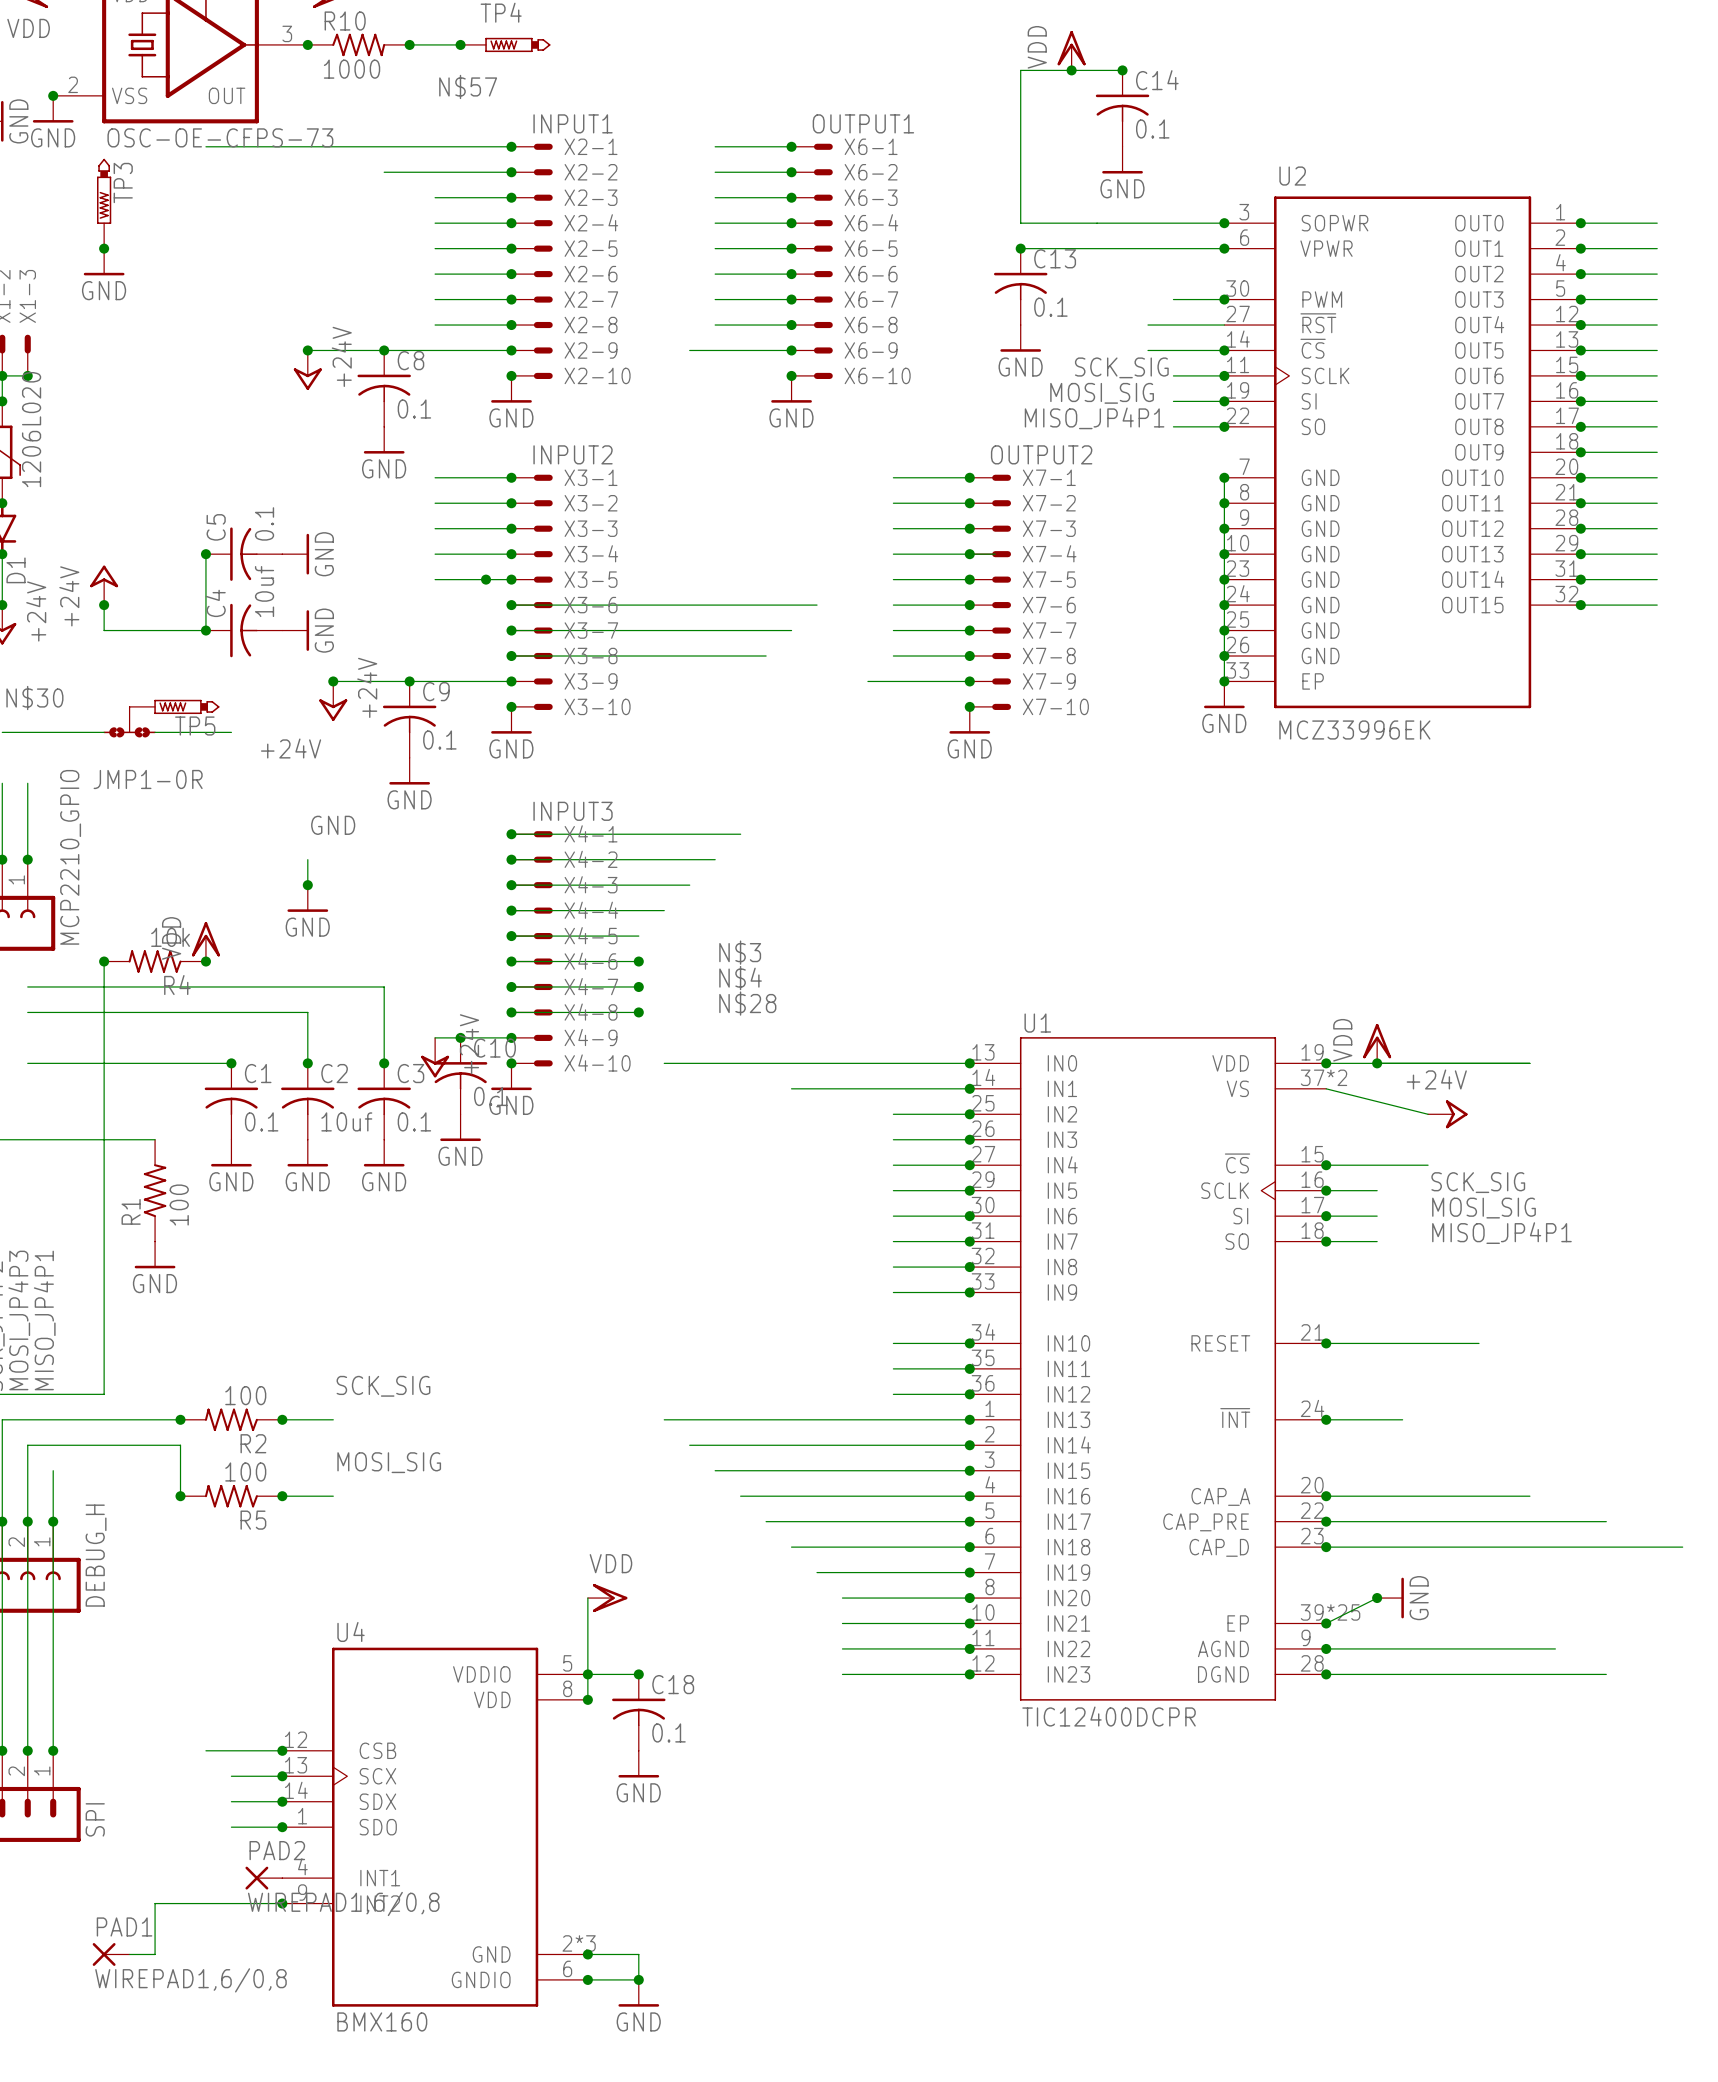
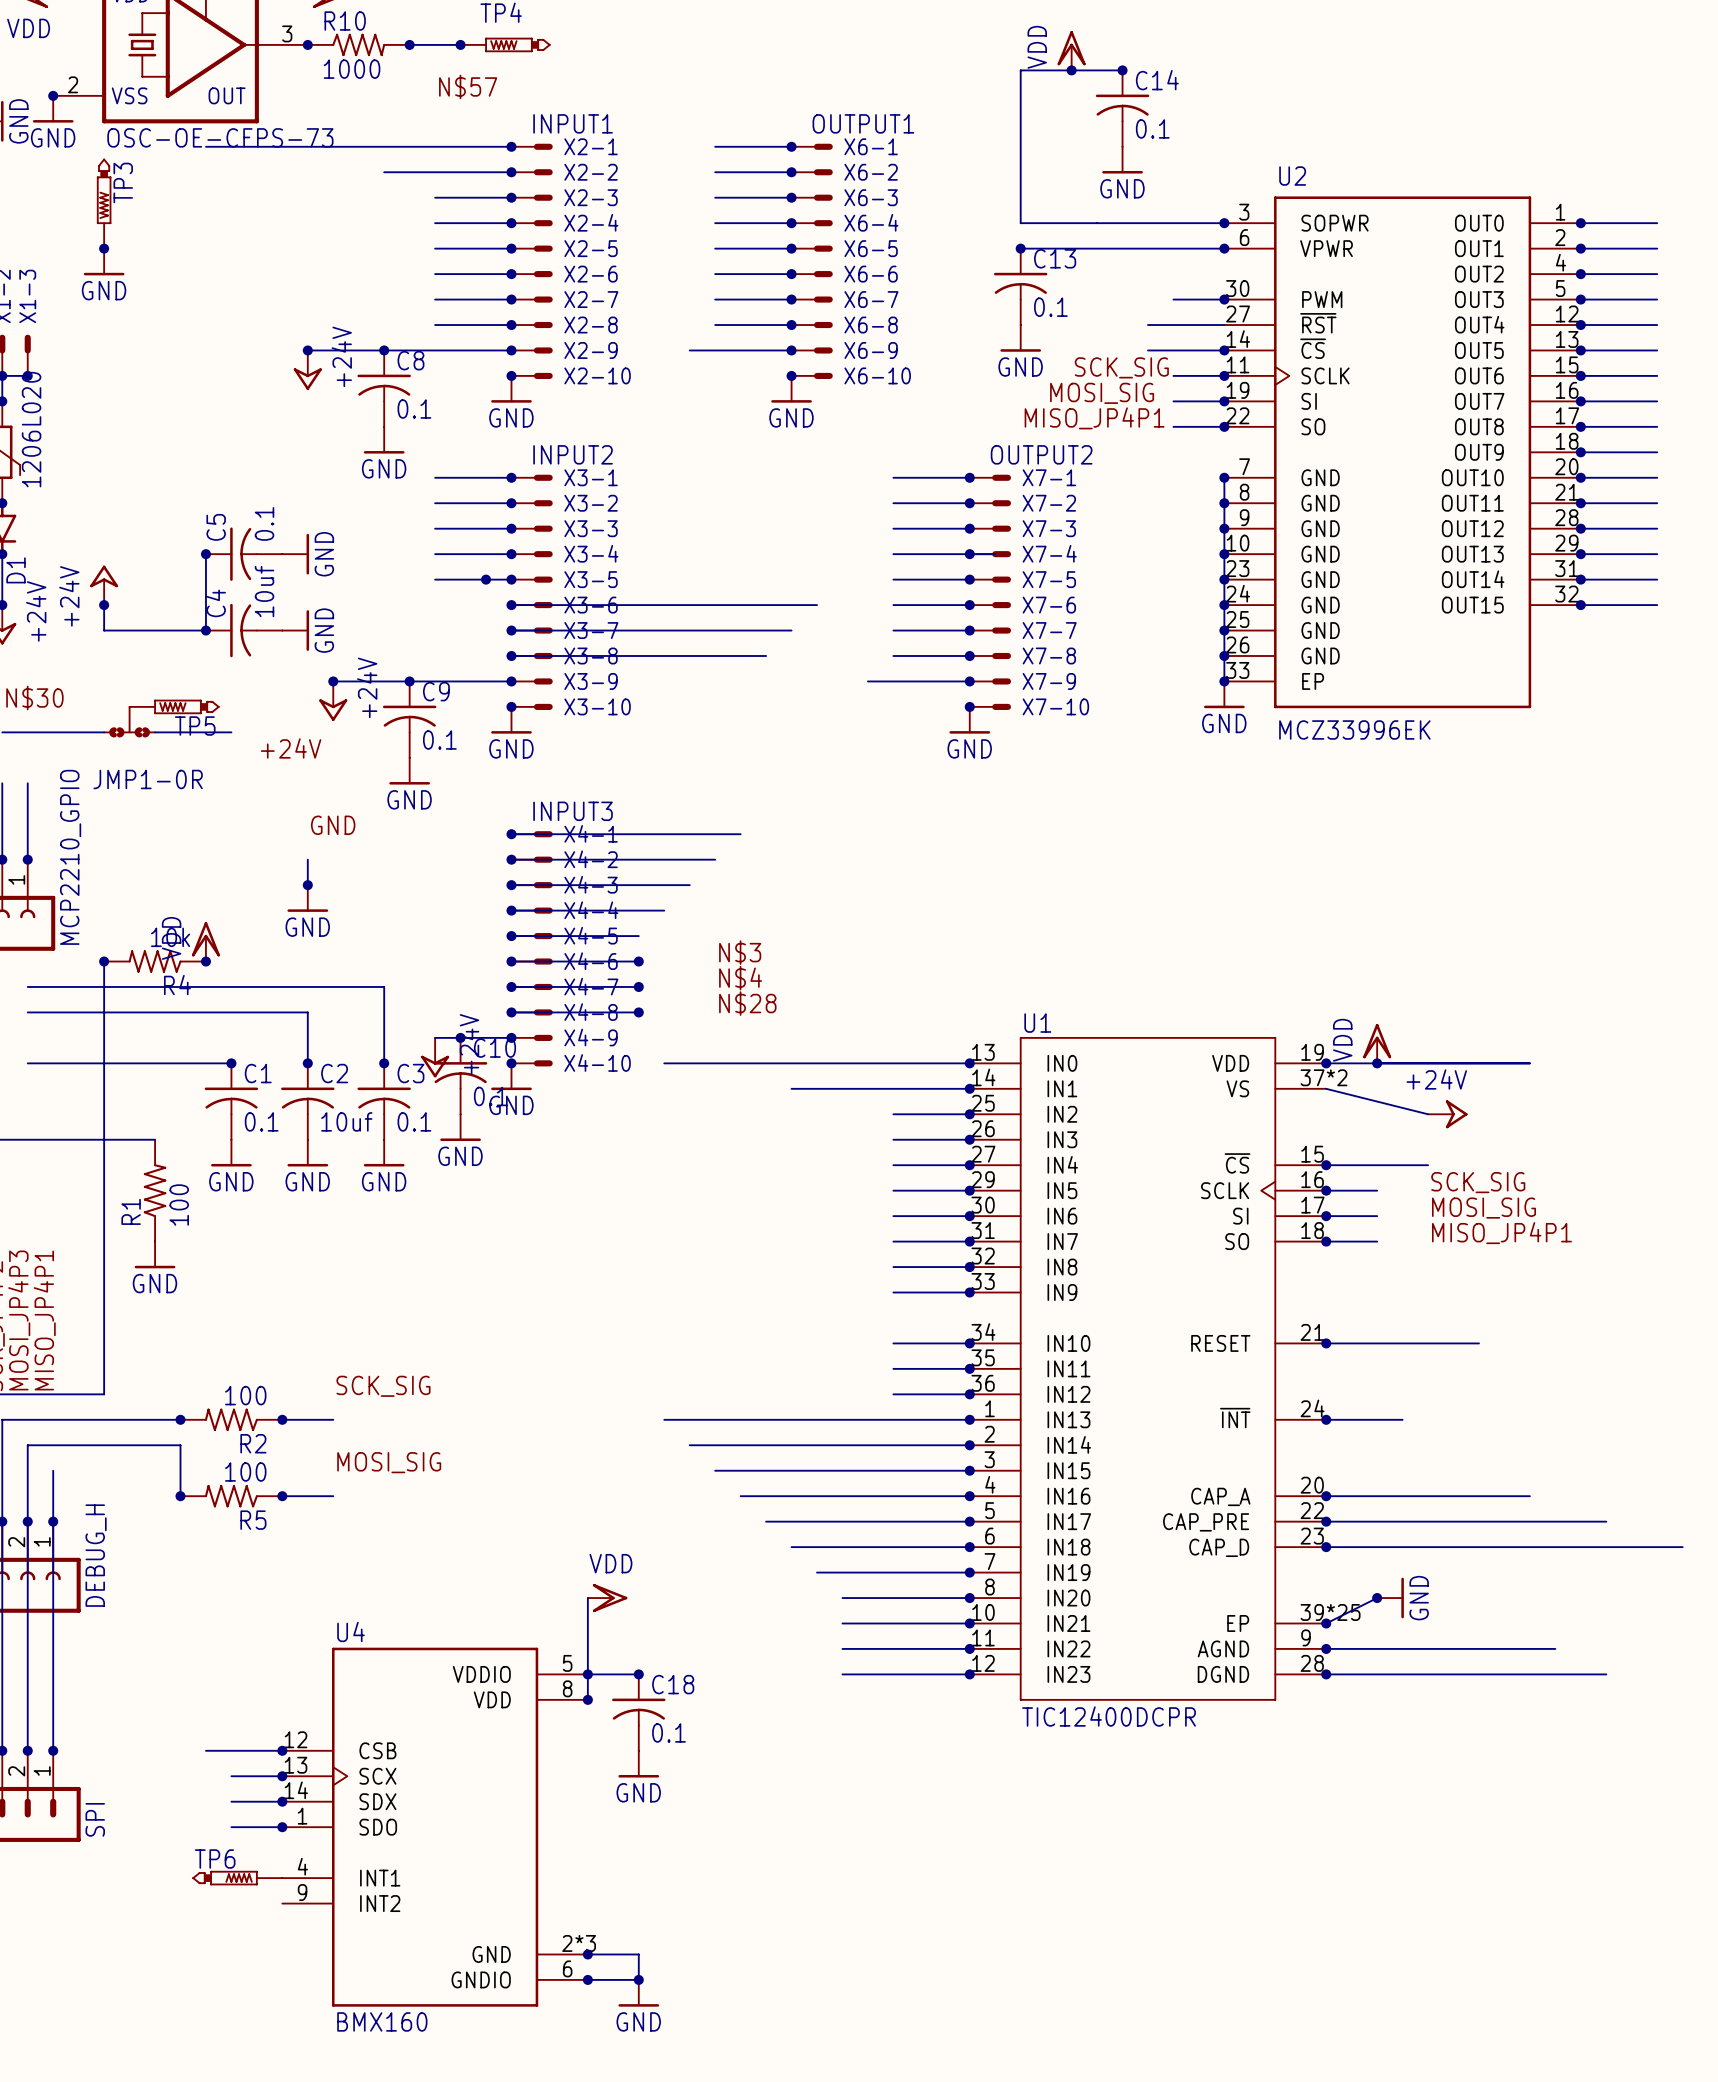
TP6: none -> (237, 1878)
PAD2: WIREPAD1,6/0,8 (263, 1878) -> none
wire: (282, 1903) (155, 1903) (155, 1954) (129, 1954) -> none
junction: (282, 1903) -> none
PAD1: WIREPAD1,6/0,8 (111, 1954) -> none

